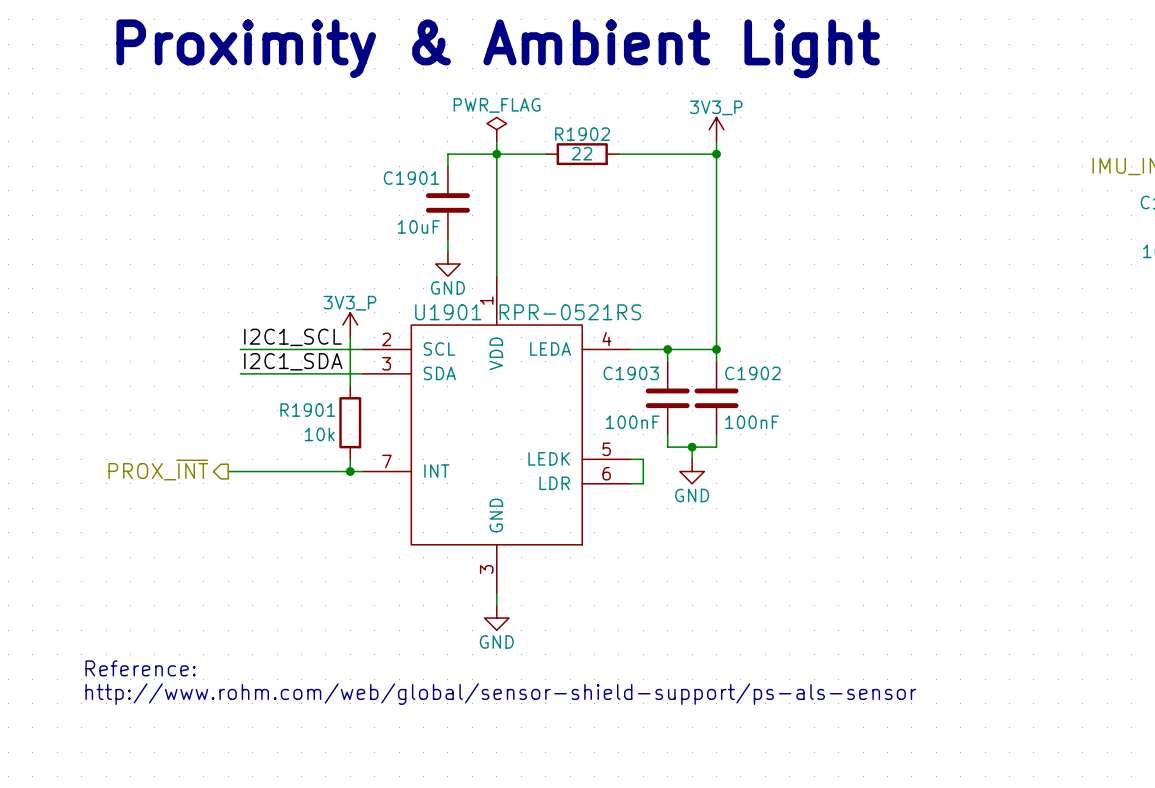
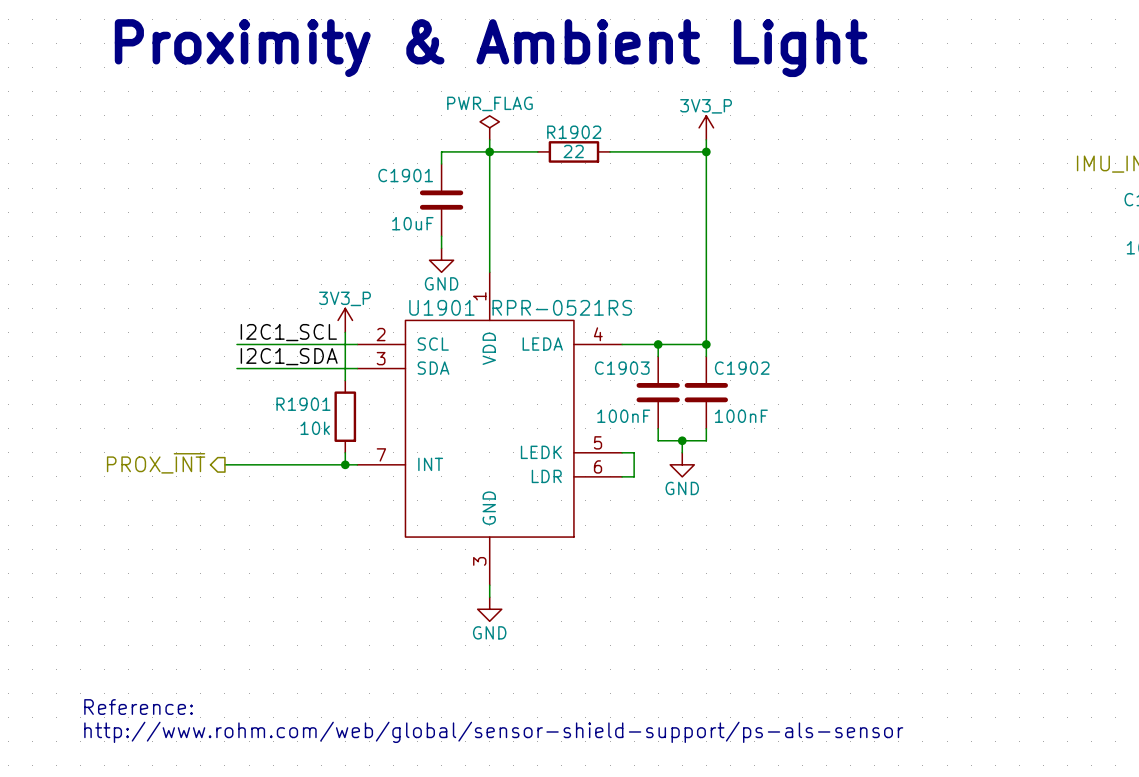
text position: Reference: (140, 668) -> Reference: (138, 707)
text position: http://www.rohm.com/web/global/sensor-shield-support/ps-als-sensor (500, 694) -> http://www.rohm.com/web/global/sensor-shield-support/ps-als-sensor (493, 732)

